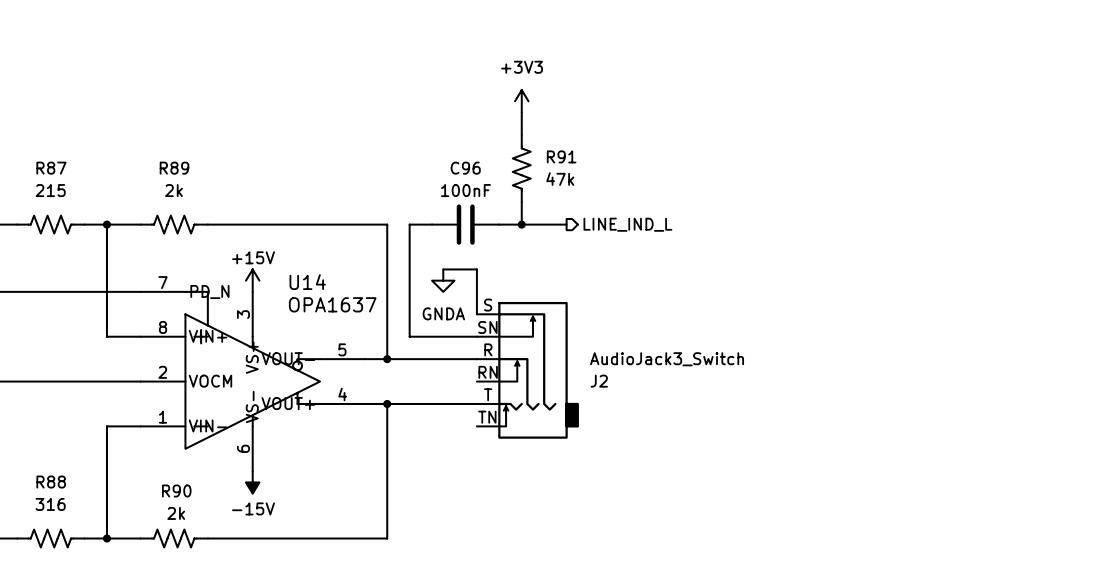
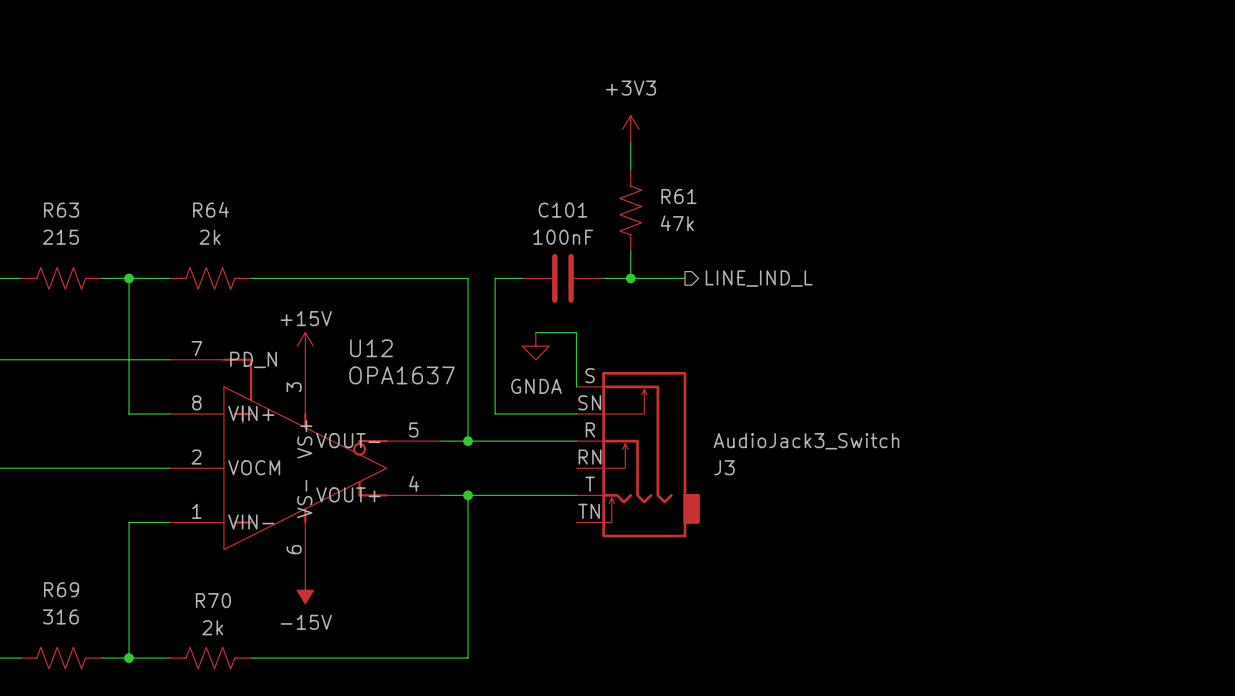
R91 name: R91 (561, 156) -> R61 (678, 196)
R87 name: R87 (51, 168) -> R63 (61, 210)
R89 name: R89 (174, 168) -> R64 (211, 209)
C96 name: C96 (465, 168) -> C101 (562, 210)
U14 name: U14 (307, 282) -> U12 (371, 348)
J2 name: J2 (599, 381) -> J3 (724, 467)
R88 name: R88 (51, 482) -> R69 (61, 589)
R90 name: R90 (176, 491) -> R70 (213, 600)

